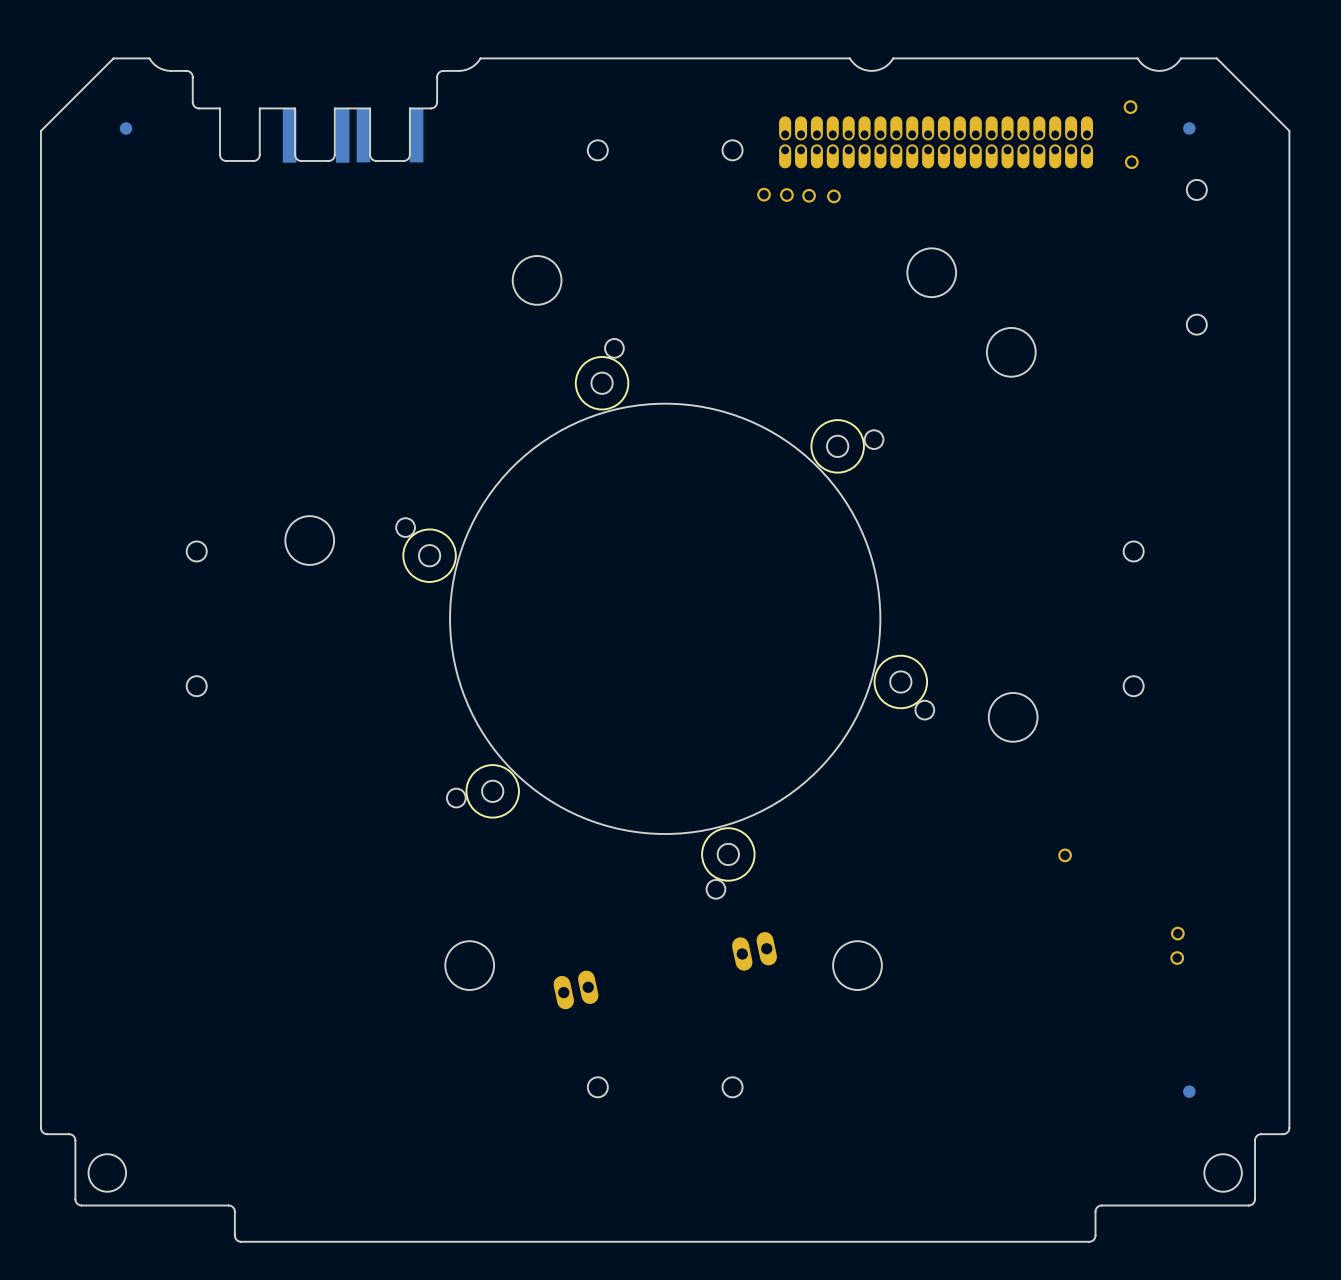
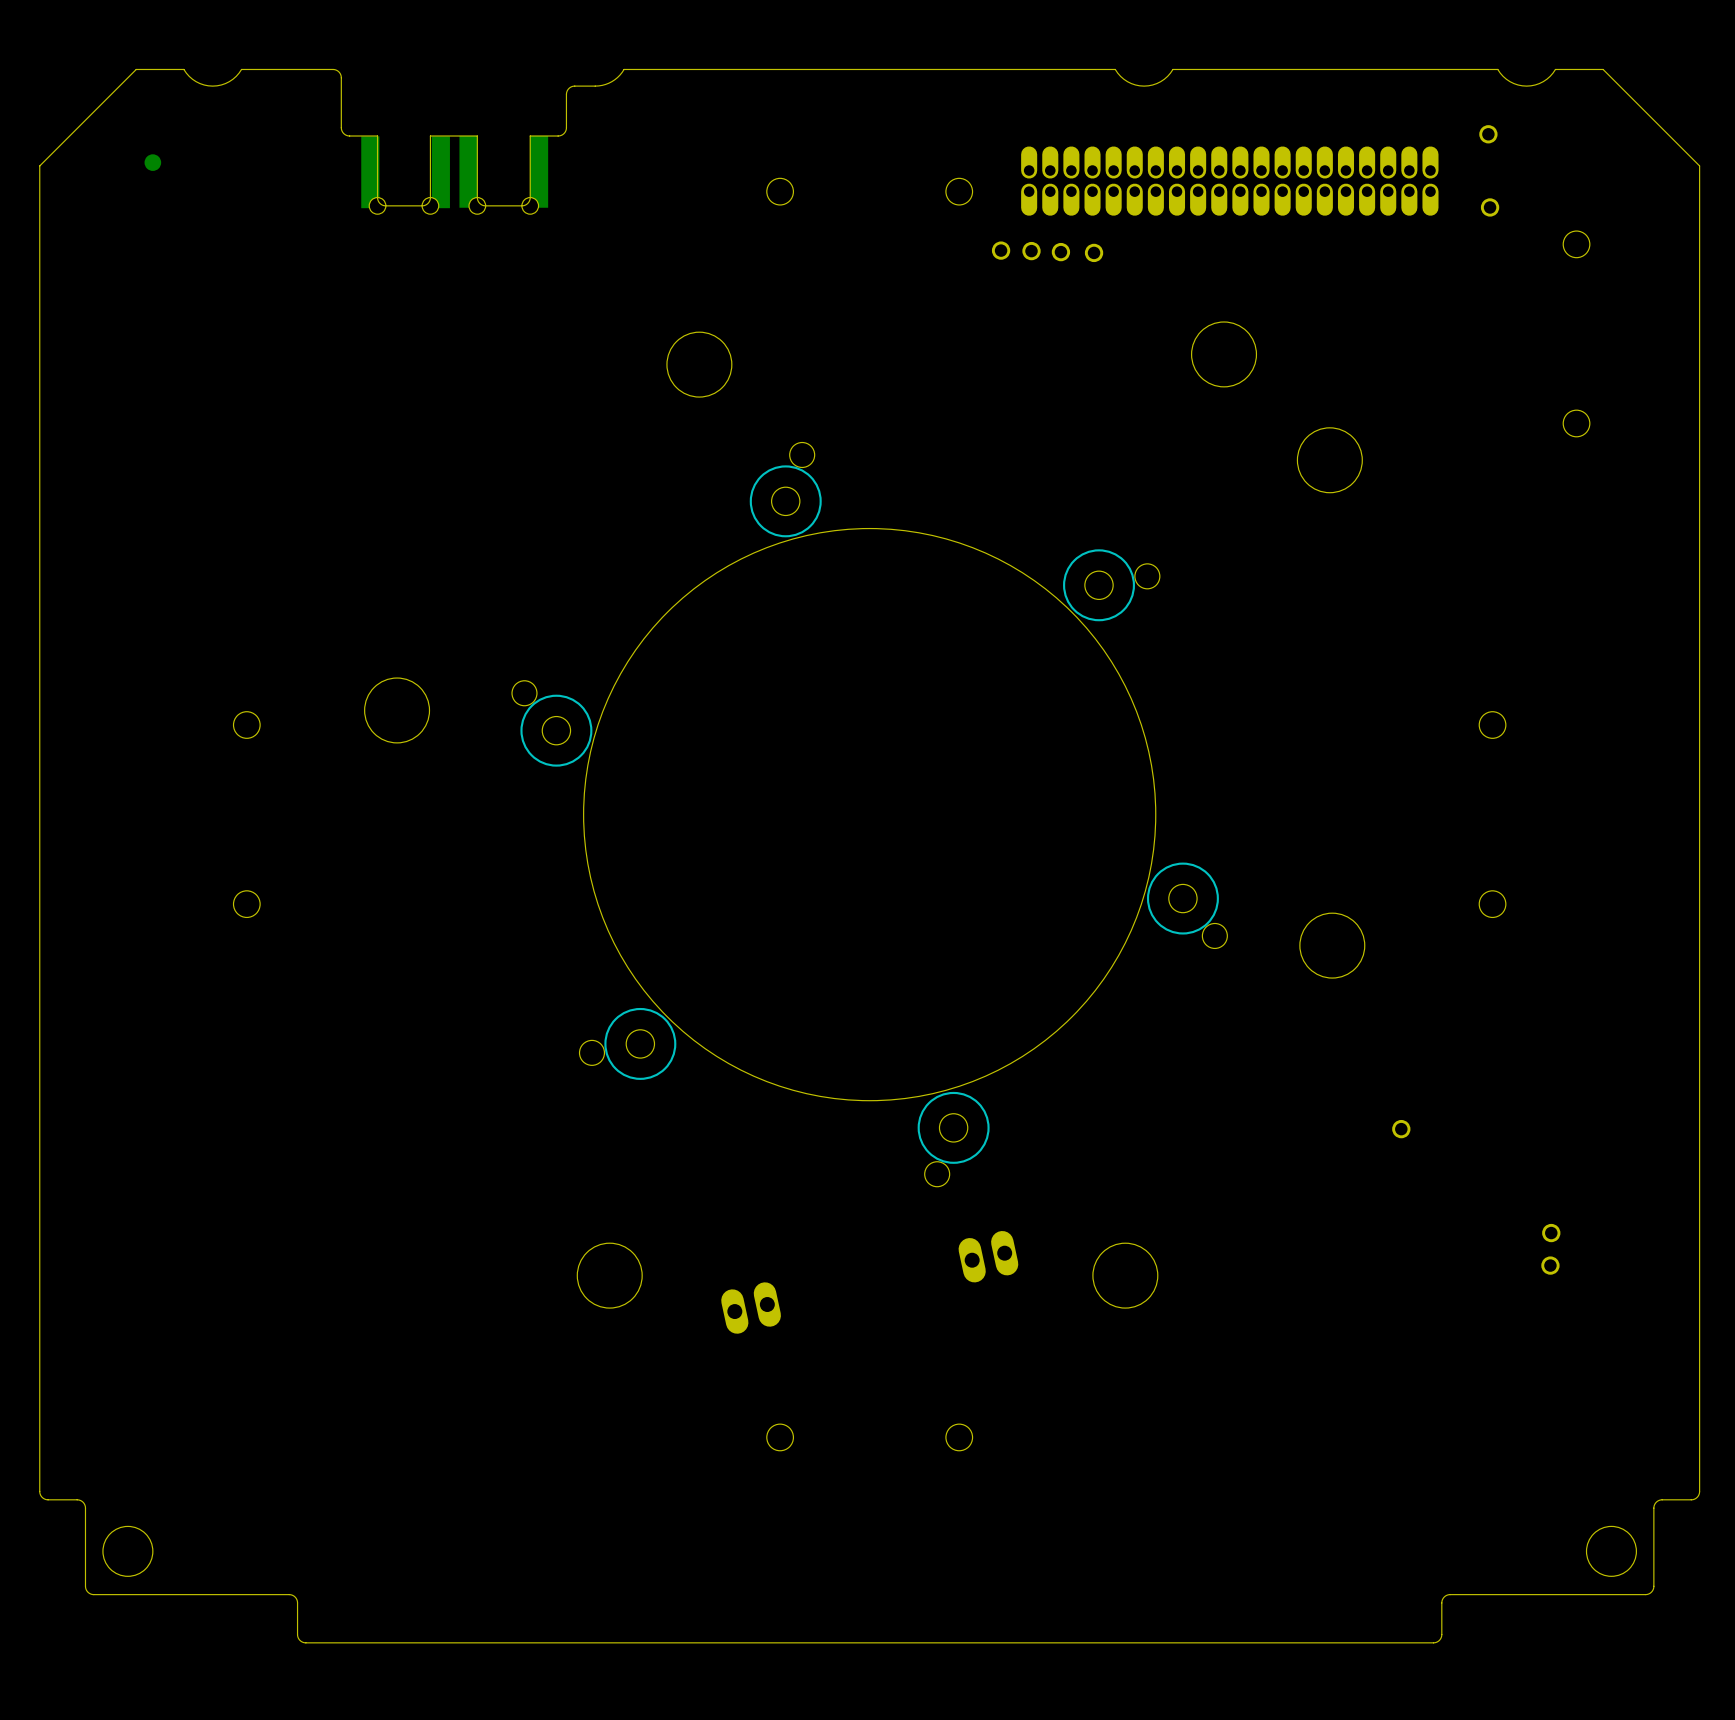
part footprint: [40, 58, 1290, 1242] -> [39, 69, 1700, 1643]
part: (1189, 128) -> none
part: (1189, 1091) -> none

